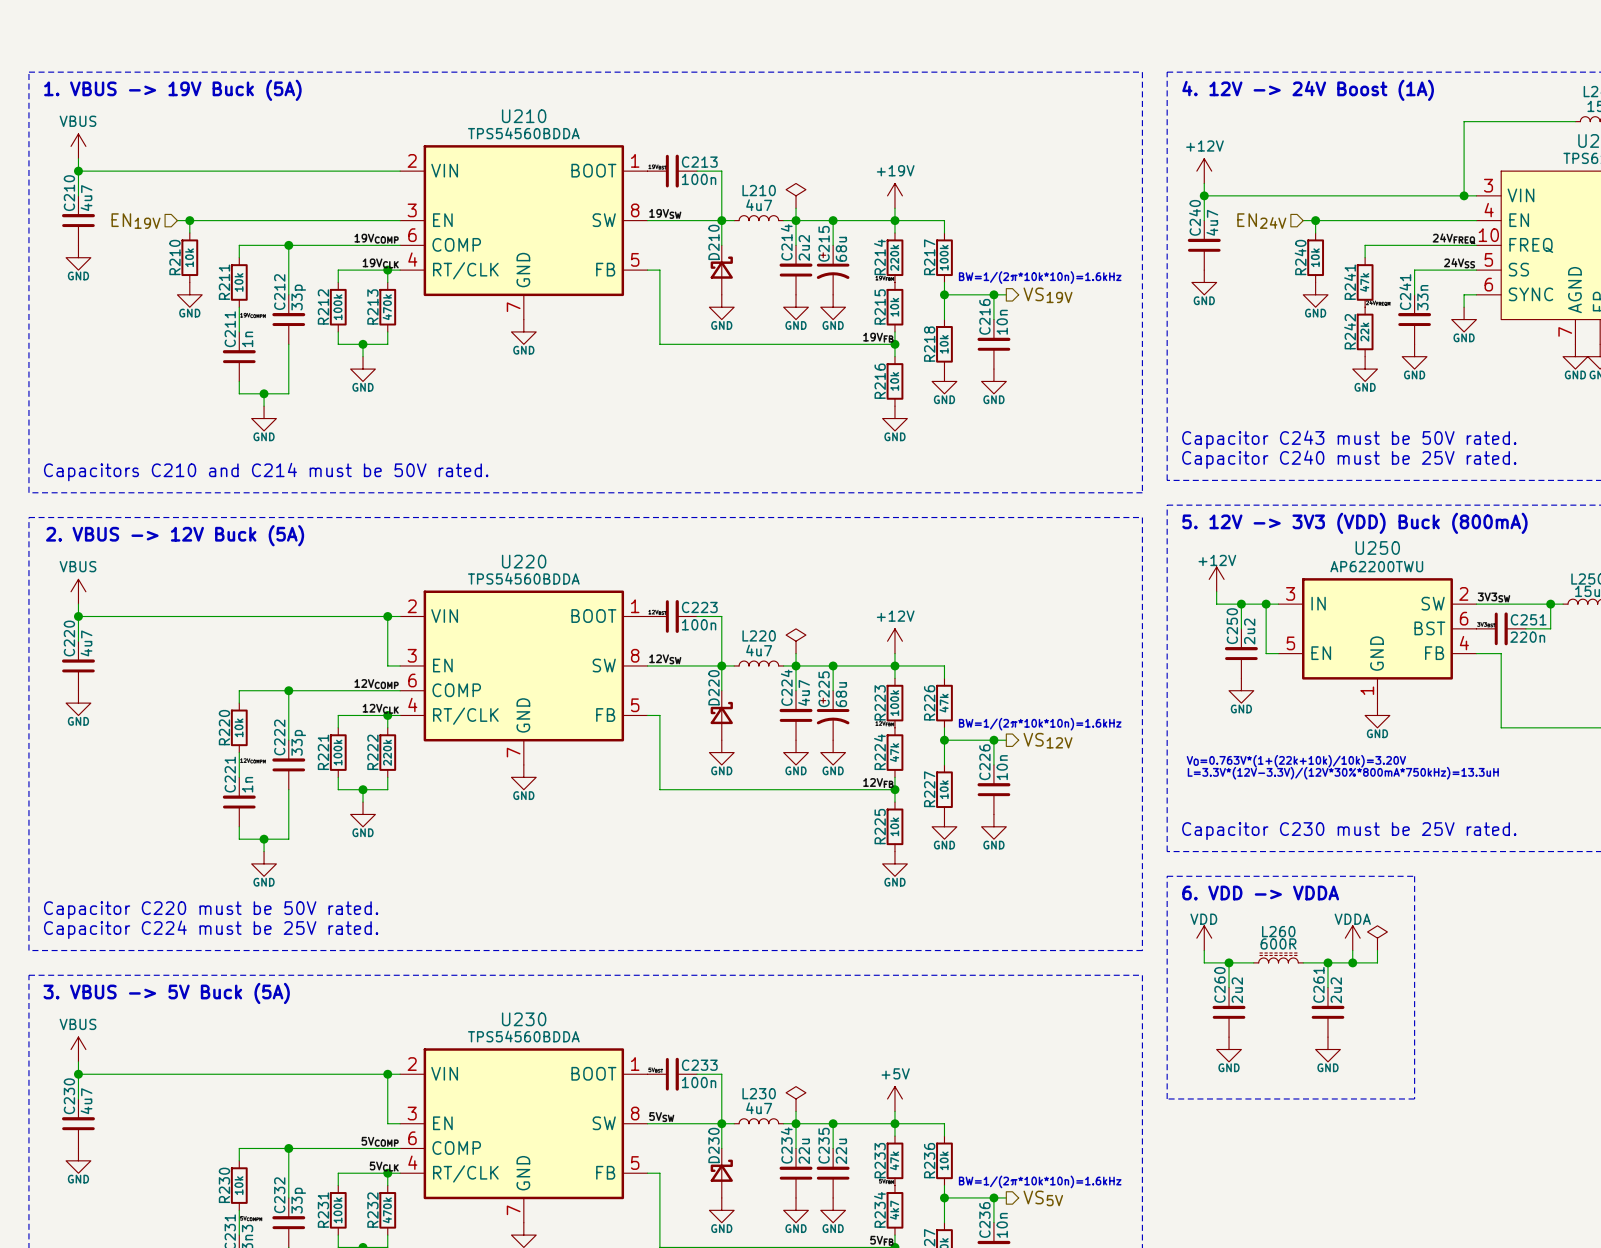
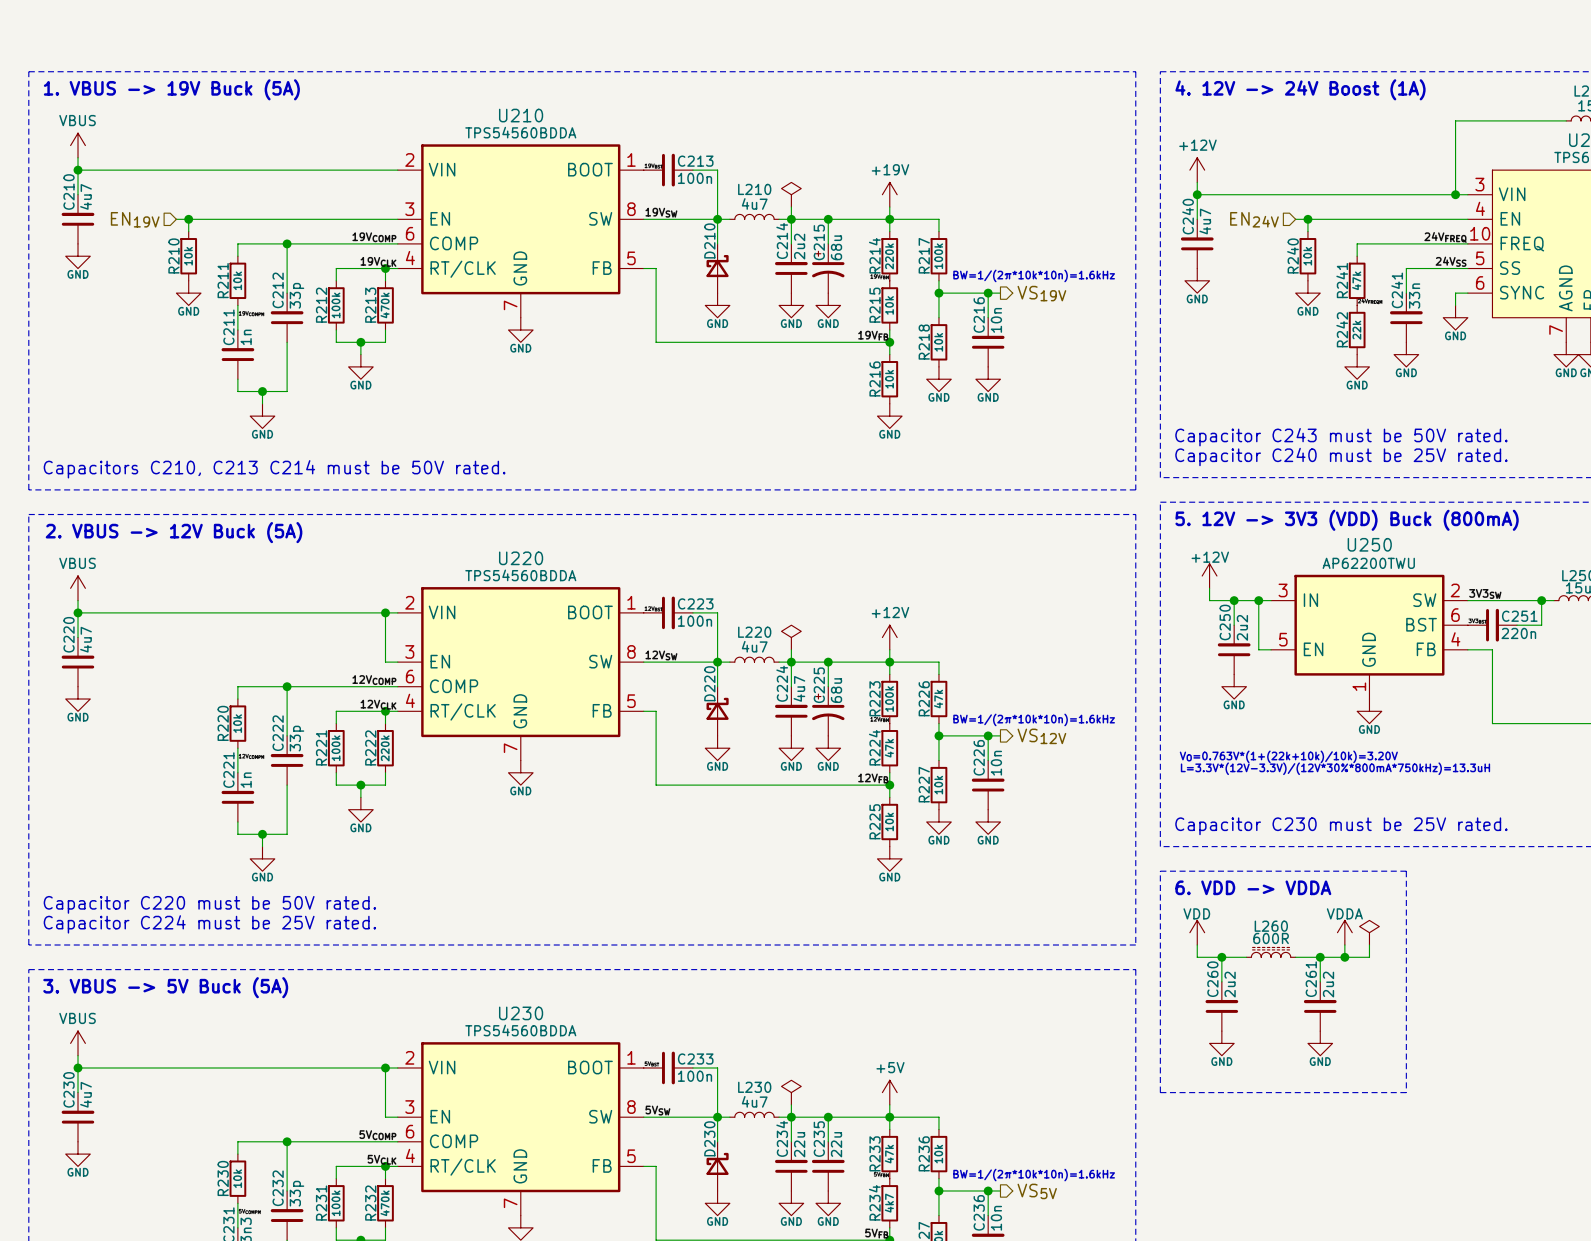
text: Capacitors C210 and C214 must be 50V rated. (266, 472) -> Capacitors C210, C213 C214 must be 50V rated. (274, 469)

